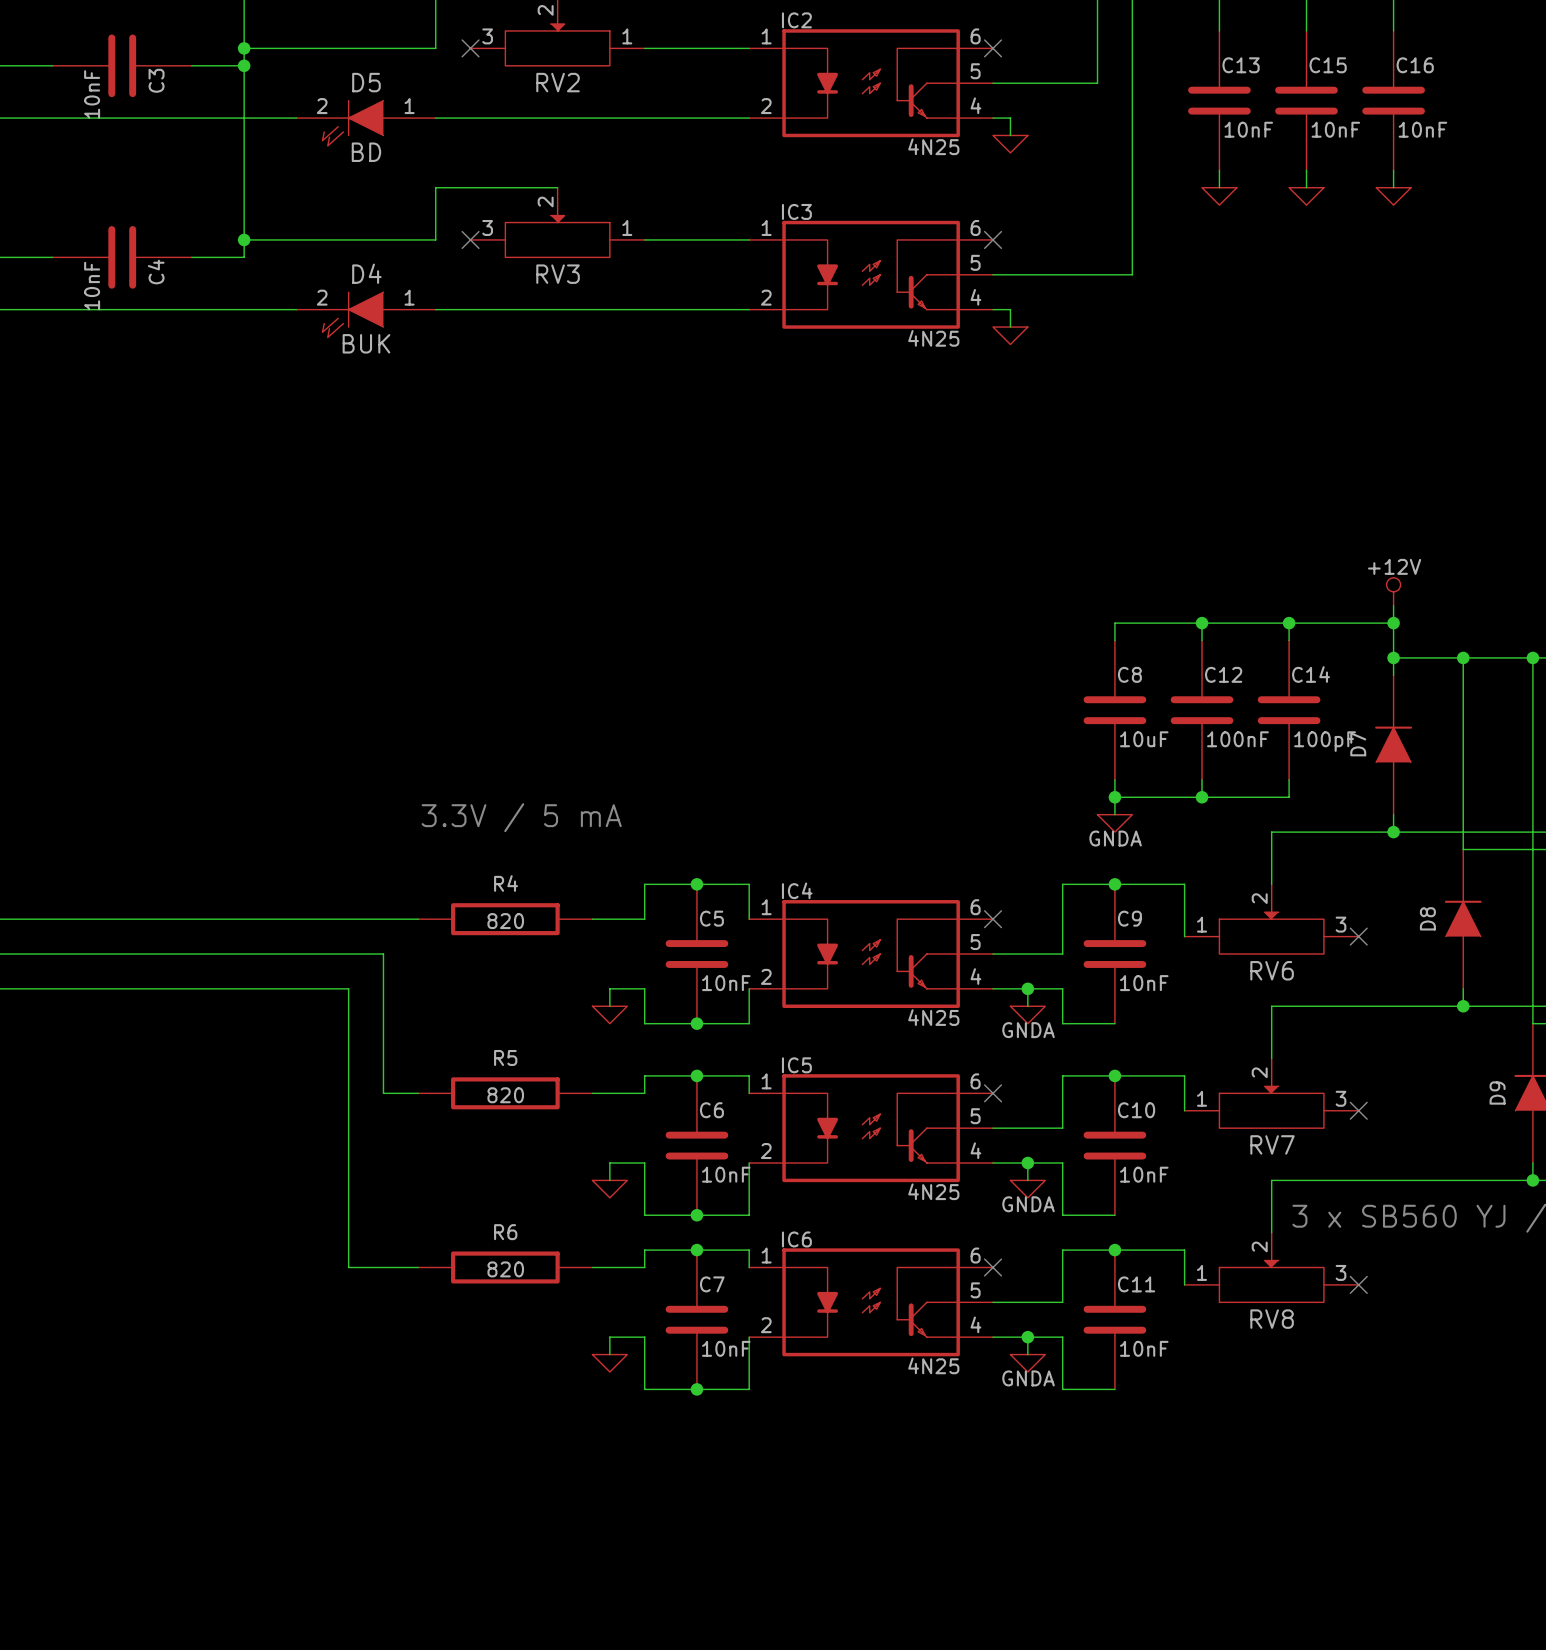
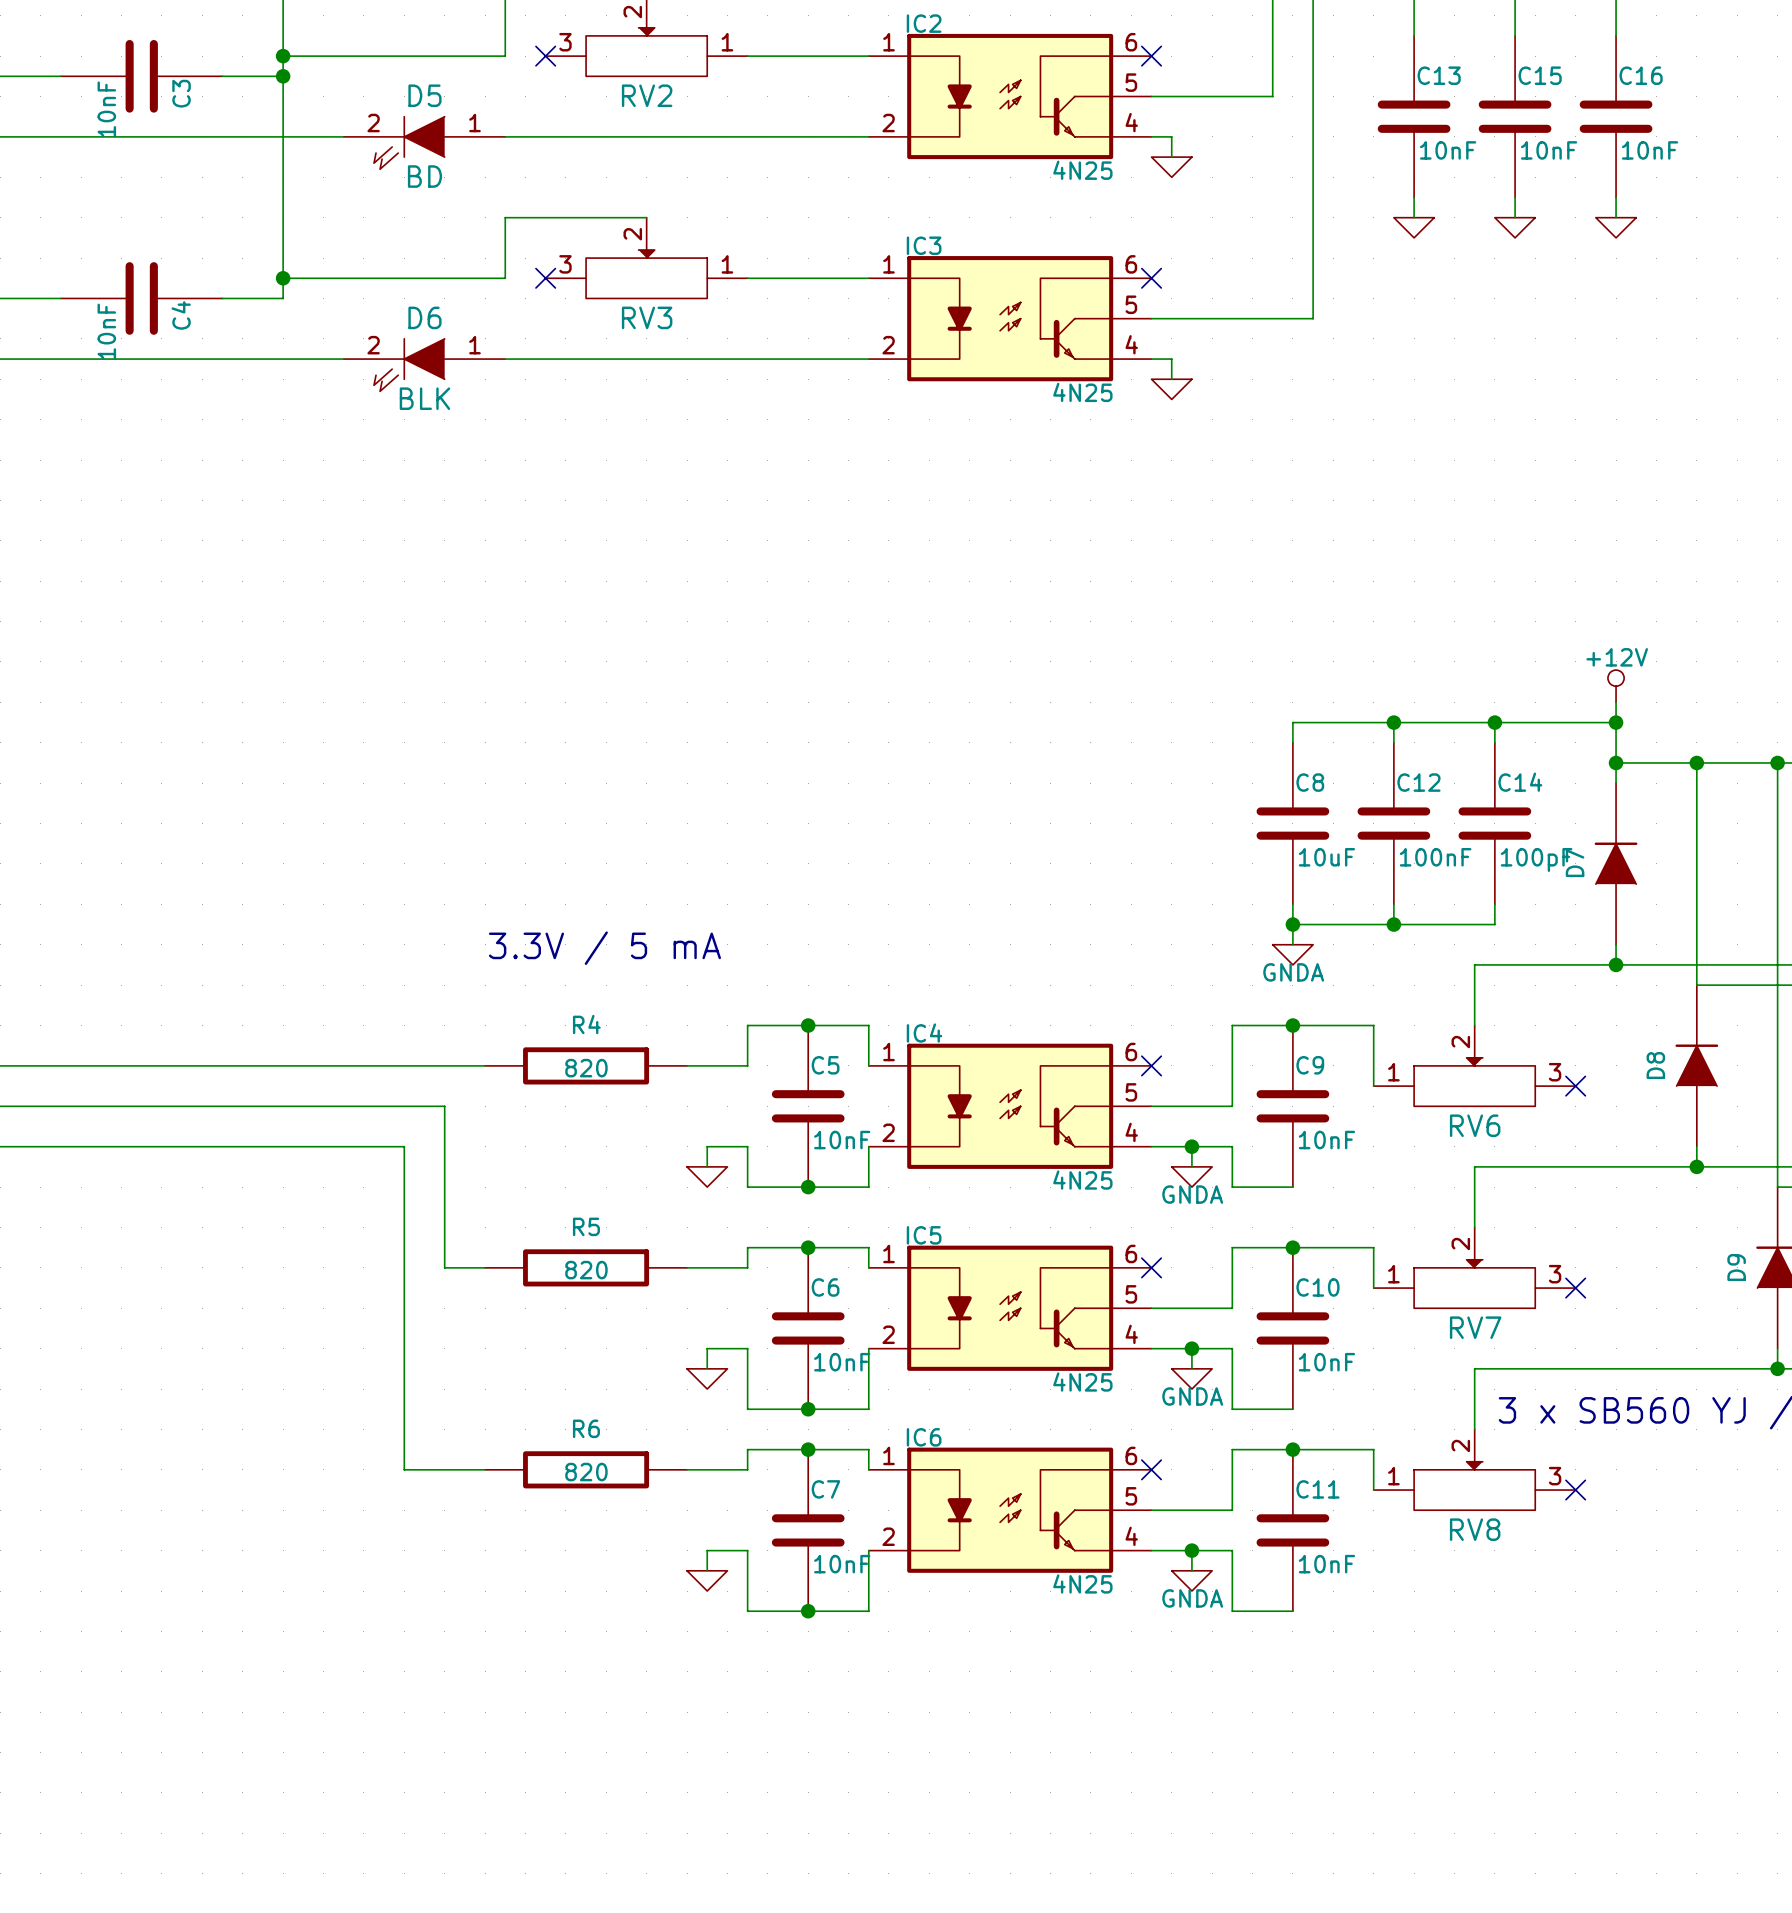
D4 name: D4 (366, 273) -> D6 (424, 317)
D4 value: BUK (366, 343) -> BLK (424, 398)

